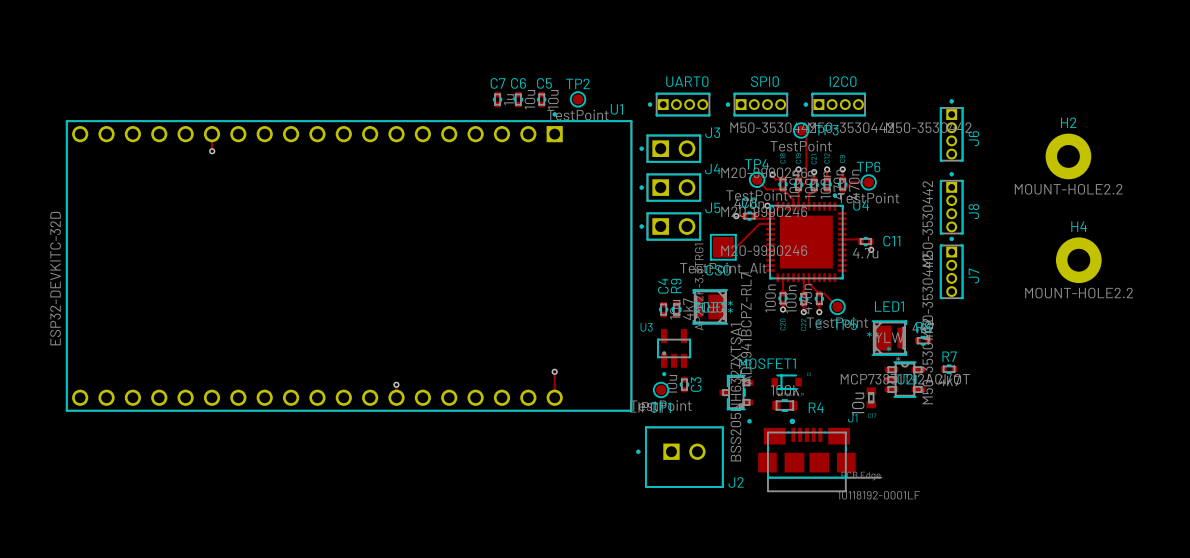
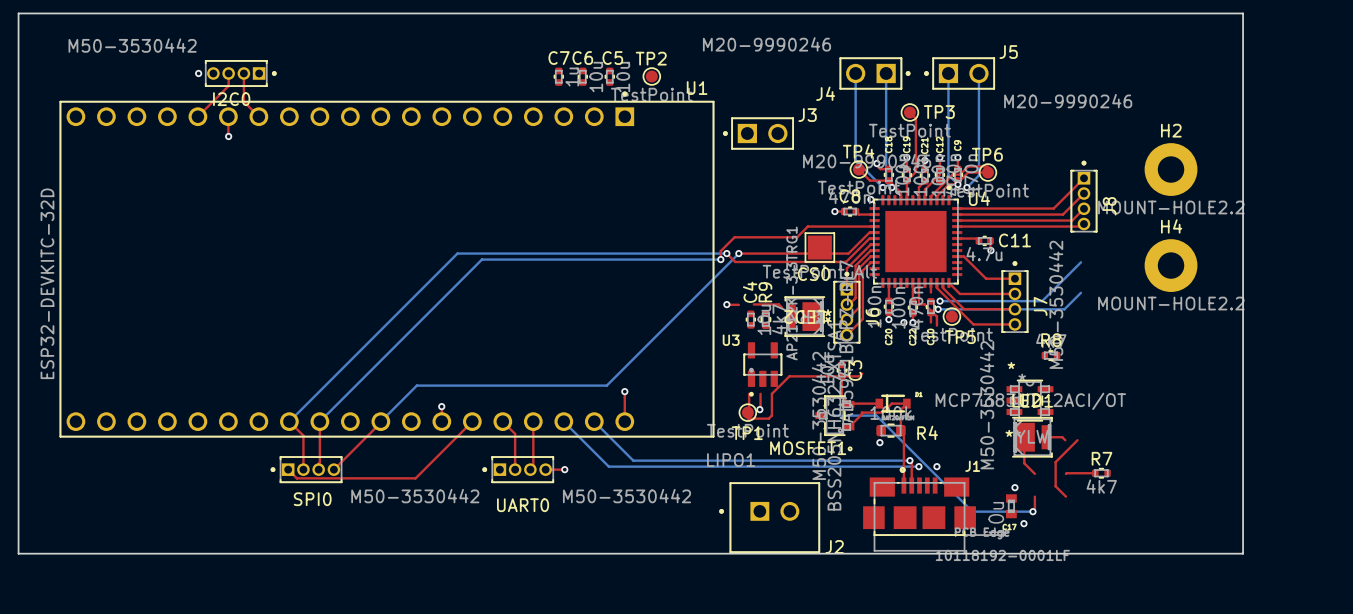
board edge: none -> (18, 13) (1243, 13) (1243, 553) (18, 553) (18, 13)
UART0 name position: UART0 (687, 81) -> UART0 (523, 505)
SPI0 name position: SPI0 (764, 81) -> SPI0 (312, 499)
via: none -> (198, 73)
top track: none -> (228, 73) (228, 85) (197, 116)
top track: none -> (243, 73) (243, 101) (258, 116)
bottom track: none -> (855, 73) (855, 160) (882, 187)
bottom track: none -> (886, 73) (886, 181) (891, 187)
bottom track: none -> (948, 73) (948, 175) (957, 184)
bottom track: none -> (978, 73) (978, 175) (966, 187)
UART0 position: (679, 104) -> (518, 469)
SPI0 position: (756, 104) -> (306, 469)
I2C0 rotation: 0° (834, 104) -> 180° (240, 73)
I2C0 position: (834, 104) -> (240, 73)
J6 position: (951, 130) -> (846, 307)
H2 position: (1068, 156) -> (1171, 169)
top track: none -> (987, 166) (968, 166) (960, 174) (952, 174) (930, 196) (930, 200)
top track: none -> (939, 174) (924, 189) (924, 200)
J4 rotation: 0° (670, 187) -> 180° (875, 73)
J4 position: (670, 187) -> (875, 73)
top track: none -> (1083, 178) (1053, 208) (957, 208)
top track: none -> (957, 184) (948, 184) (936, 196) (936, 200)
via: none -> (957, 184)
via: none -> (882, 187)
via: none -> (891, 187)
via: none -> (966, 187)
top track: none -> (1083, 193) (1062, 214) (957, 214)
top track: none -> (1083, 208) (1072, 220) (957, 220)
top track: (770, 223) (759, 223) (736, 247) (723, 247) -> none
J5 position: (670, 226) -> (959, 73)
top track: none -> (1083, 224) (1081, 226) (957, 226)
top track: none -> (874, 226) (807, 226) (797, 237) (734, 237) (720, 251) (720, 259)
top track: none -> (874, 232) (869, 232) (848, 253) (738, 253)
top track: none -> (874, 238) (869, 238) (846, 261) (735, 261) (726, 253)
top track: none -> (874, 244) (870, 244) (846, 268) (846, 289)
top track: none -> (874, 250) (870, 250) (855, 265) (855, 298) (846, 304)
bottom track: none -> (726, 253) (457, 253) (289, 421)
via: none -> (726, 253)
bottom track: none -> (738, 253) (606, 385) (416, 385) (380, 421)
via: none -> (738, 253)
top track: none -> (874, 256) (870, 256) (859, 268) (859, 307) (846, 319)
top track: none -> (957, 256) (963, 256) (986, 278) (1014, 278)
bottom track: none -> (720, 259) (481, 259) (319, 421)
via: none -> (720, 259)
top track: none -> (874, 262) (870, 262) (862, 270) (862, 319) (846, 335)
bottom track: none -> (1080, 262) (1042, 301) (940, 301)
H4 position: (1078, 260) -> (1171, 265)
J7 position: (951, 267) -> (1014, 296)
top track: none -> (930, 282) (930, 292)
top track: none -> (936, 282) (936, 287) (973, 324) (1014, 324)
top track: none -> (942, 282) (942, 287) (964, 309) (1014, 309)
top track: none -> (948, 282) (959, 293) (1014, 293)
top track: (808, 283) (819, 293) (824, 293) (837, 306) -> (918, 289) (918, 304) (924, 304) (936, 316) (936, 325)
bottom track: none -> (1080, 292) (1064, 309) (938, 309)
via: none -> (940, 301)
top track: none -> (726, 304) (738, 304)
via: none -> (726, 304)
top track: none -> (753, 304) (778, 304) (781, 307)
via: none -> (938, 309)
via: none -> (903, 322)
via: (819, 312) -> none
LED1 position: (889, 338) -> (1032, 437)
top track: none -> (862, 373) (859, 376) (789, 376) (771, 393) (771, 415) (768, 418) (747, 418) (749, 393)
top track: none -> (841, 376) (841, 396) (849, 404) (879, 403)
MOSFET1 name position: MOSFET1 (767, 363) -> MOSFET1 (808, 448)
R7 position: (949, 369) -> (1101, 473)
top track: none -> (760, 393) (759, 409)
C3 position: (684, 384) -> (841, 370)
via: none -> (759, 409)
bottom track: none -> (834, 415) (876, 415) (972, 511) (1032, 511)
top track: none -> (289, 421) (303, 435) (303, 469)
top track: none -> (319, 421) (318, 469)
top track: none -> (380, 421) (333, 469)
top track: none -> (472, 421) (415, 478) (296, 478) (288, 469)
top track: none -> (502, 421) (515, 433) (515, 469)
top track: none -> (533, 421) (533, 466) (530, 469)
bottom track: none -> (563, 421) (608, 466) (918, 466)
bottom track: none -> (594, 421) (633, 460) (909, 460)
part position: (871, 397) -> (1011, 506)
top track: none -> (849, 427) (861, 412) (882, 412) (891, 403) (906, 403) (900, 409) (900, 430) (903, 433) (903, 485)
top track: none -> (1024, 437) (1024, 463) (1034, 473)
top track: none -> (1046, 437) (1062, 437) (1065, 440)
top track: none -> (1077, 440) (1055, 462) (1055, 486) (1065, 496)
via: none -> (879, 442)
top track: none -> (909, 460) (911, 462) (911, 485)
via: none -> (909, 460)
via: none -> (918, 466)
via: none -> (936, 466)
top track: none -> (545, 469) (564, 469)
via: none -> (564, 469)
top track: none -> (1095, 473) (1065, 473)
via: none -> (1014, 487)
J1 position: (819, 455) -> (934, 509)
J2 position: (679, 457) -> (769, 517)
top track: none -> (1034, 496) (1034, 509) (1032, 511)
via: none -> (1032, 511)
via: none -> (1023, 523)

